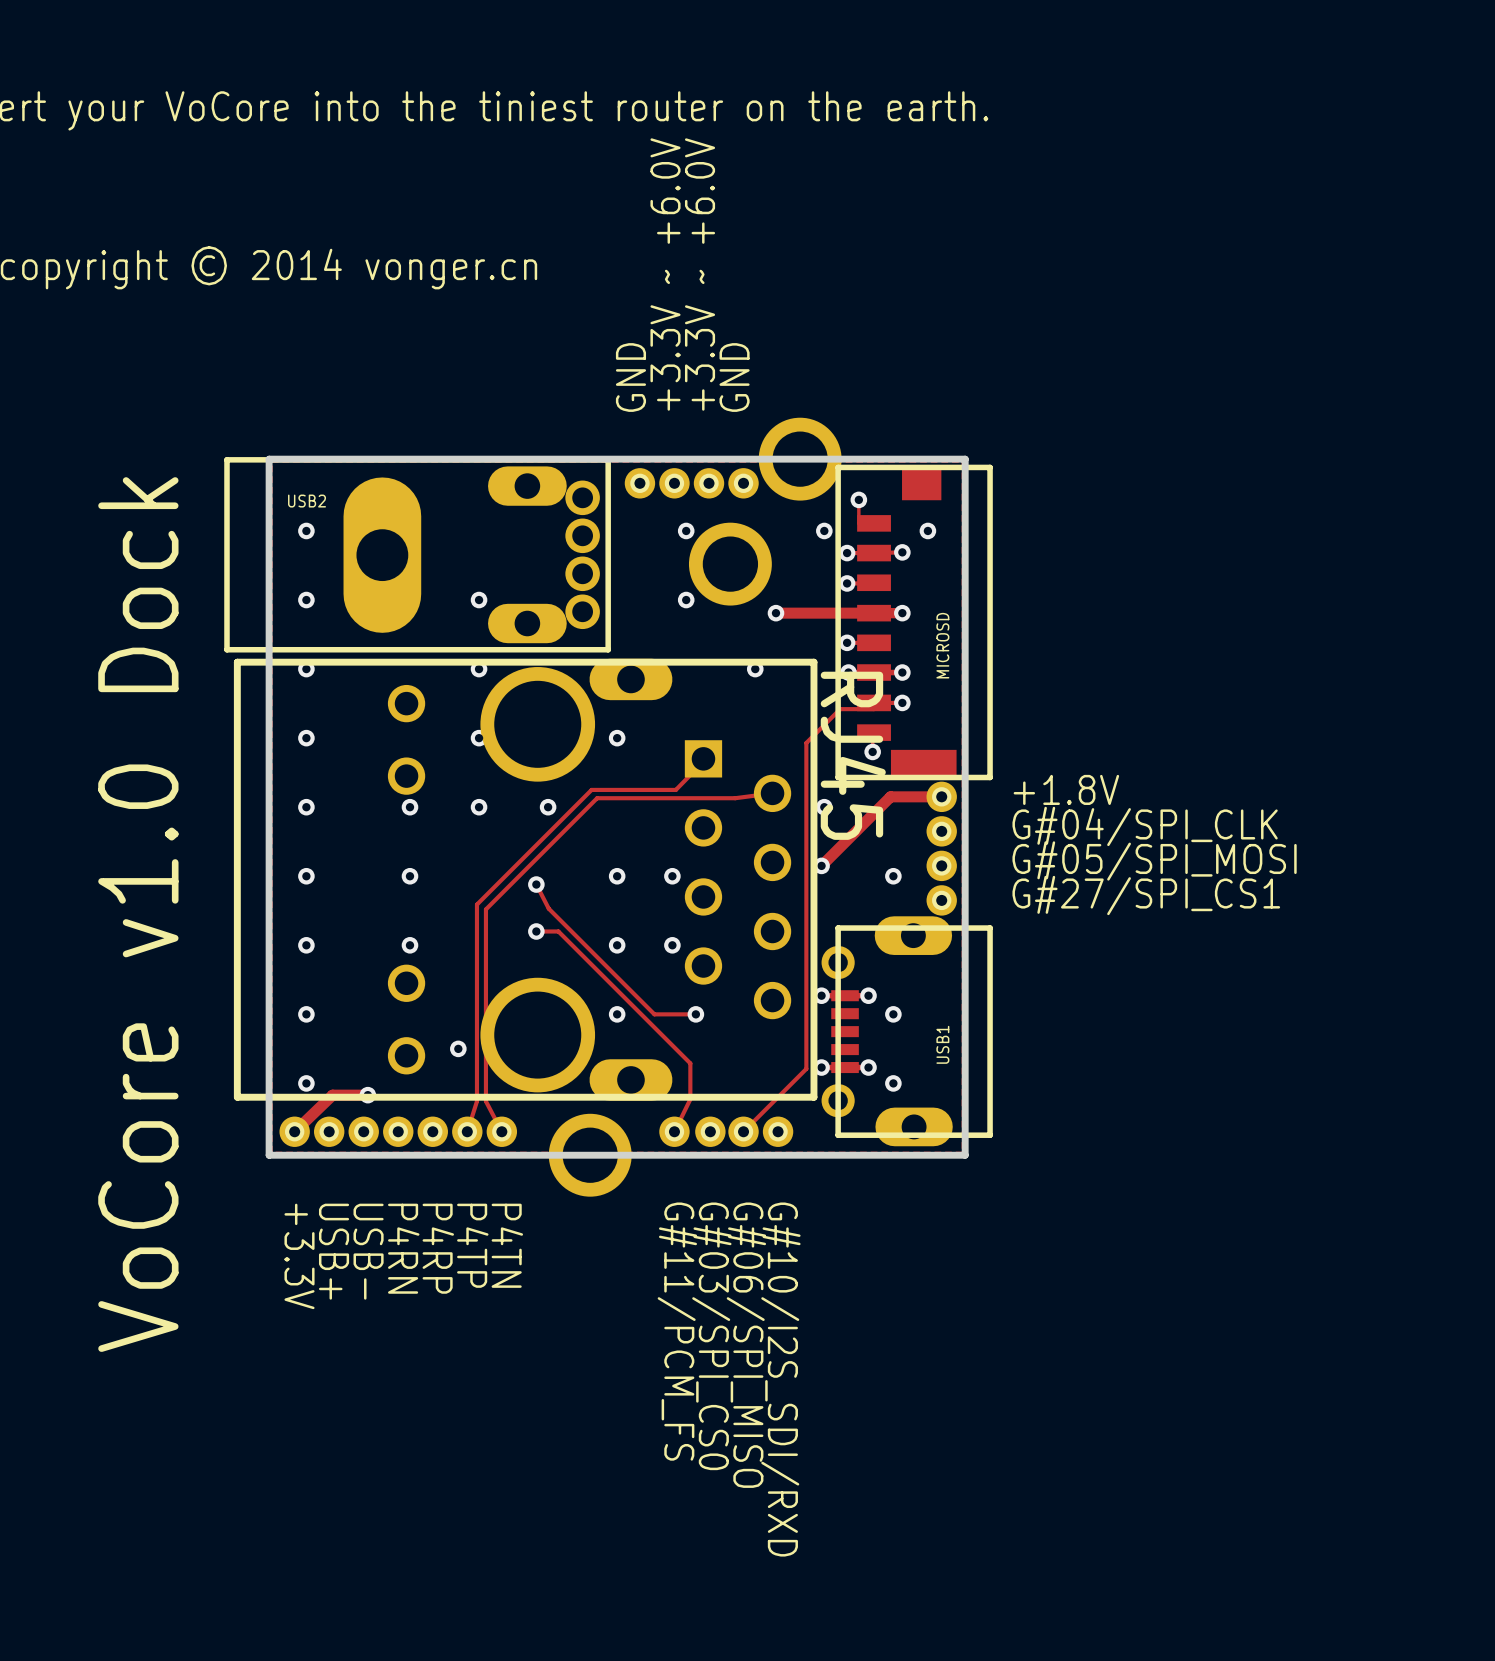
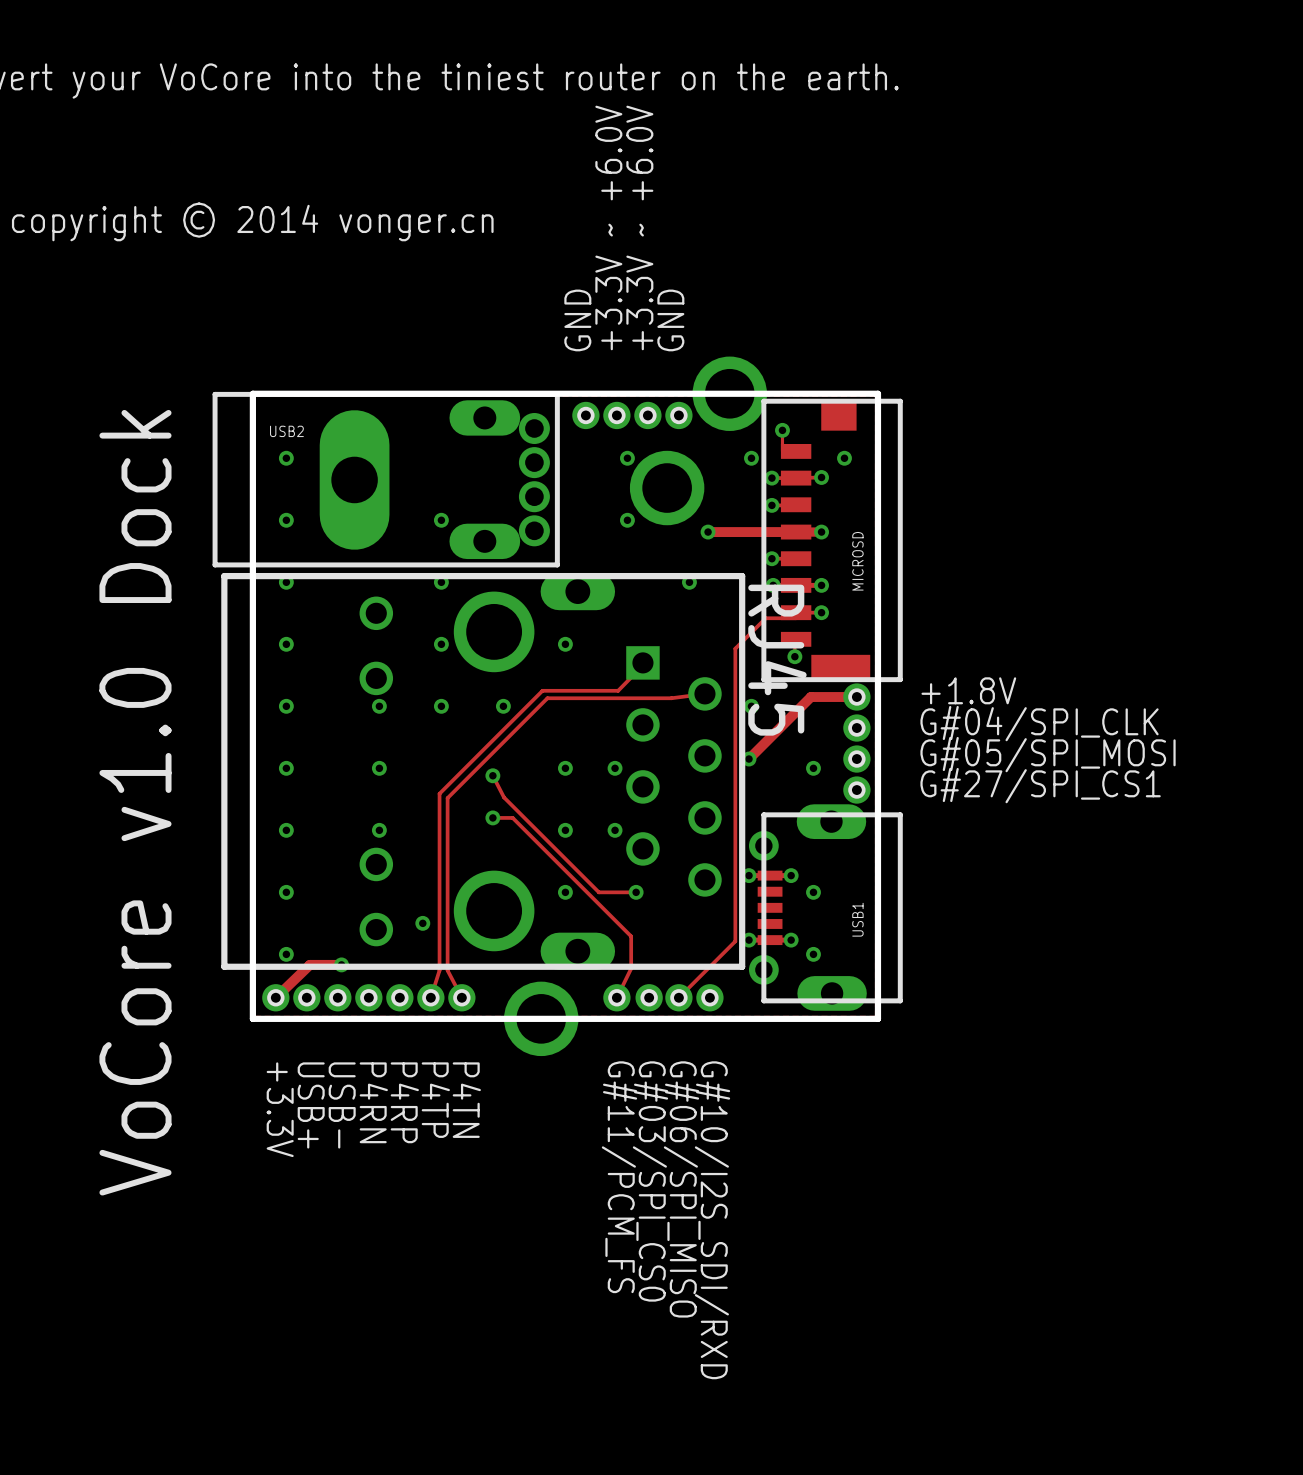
RJ45 footprint: [233, 658, 818, 1101] -> [221, 572, 746, 970]

